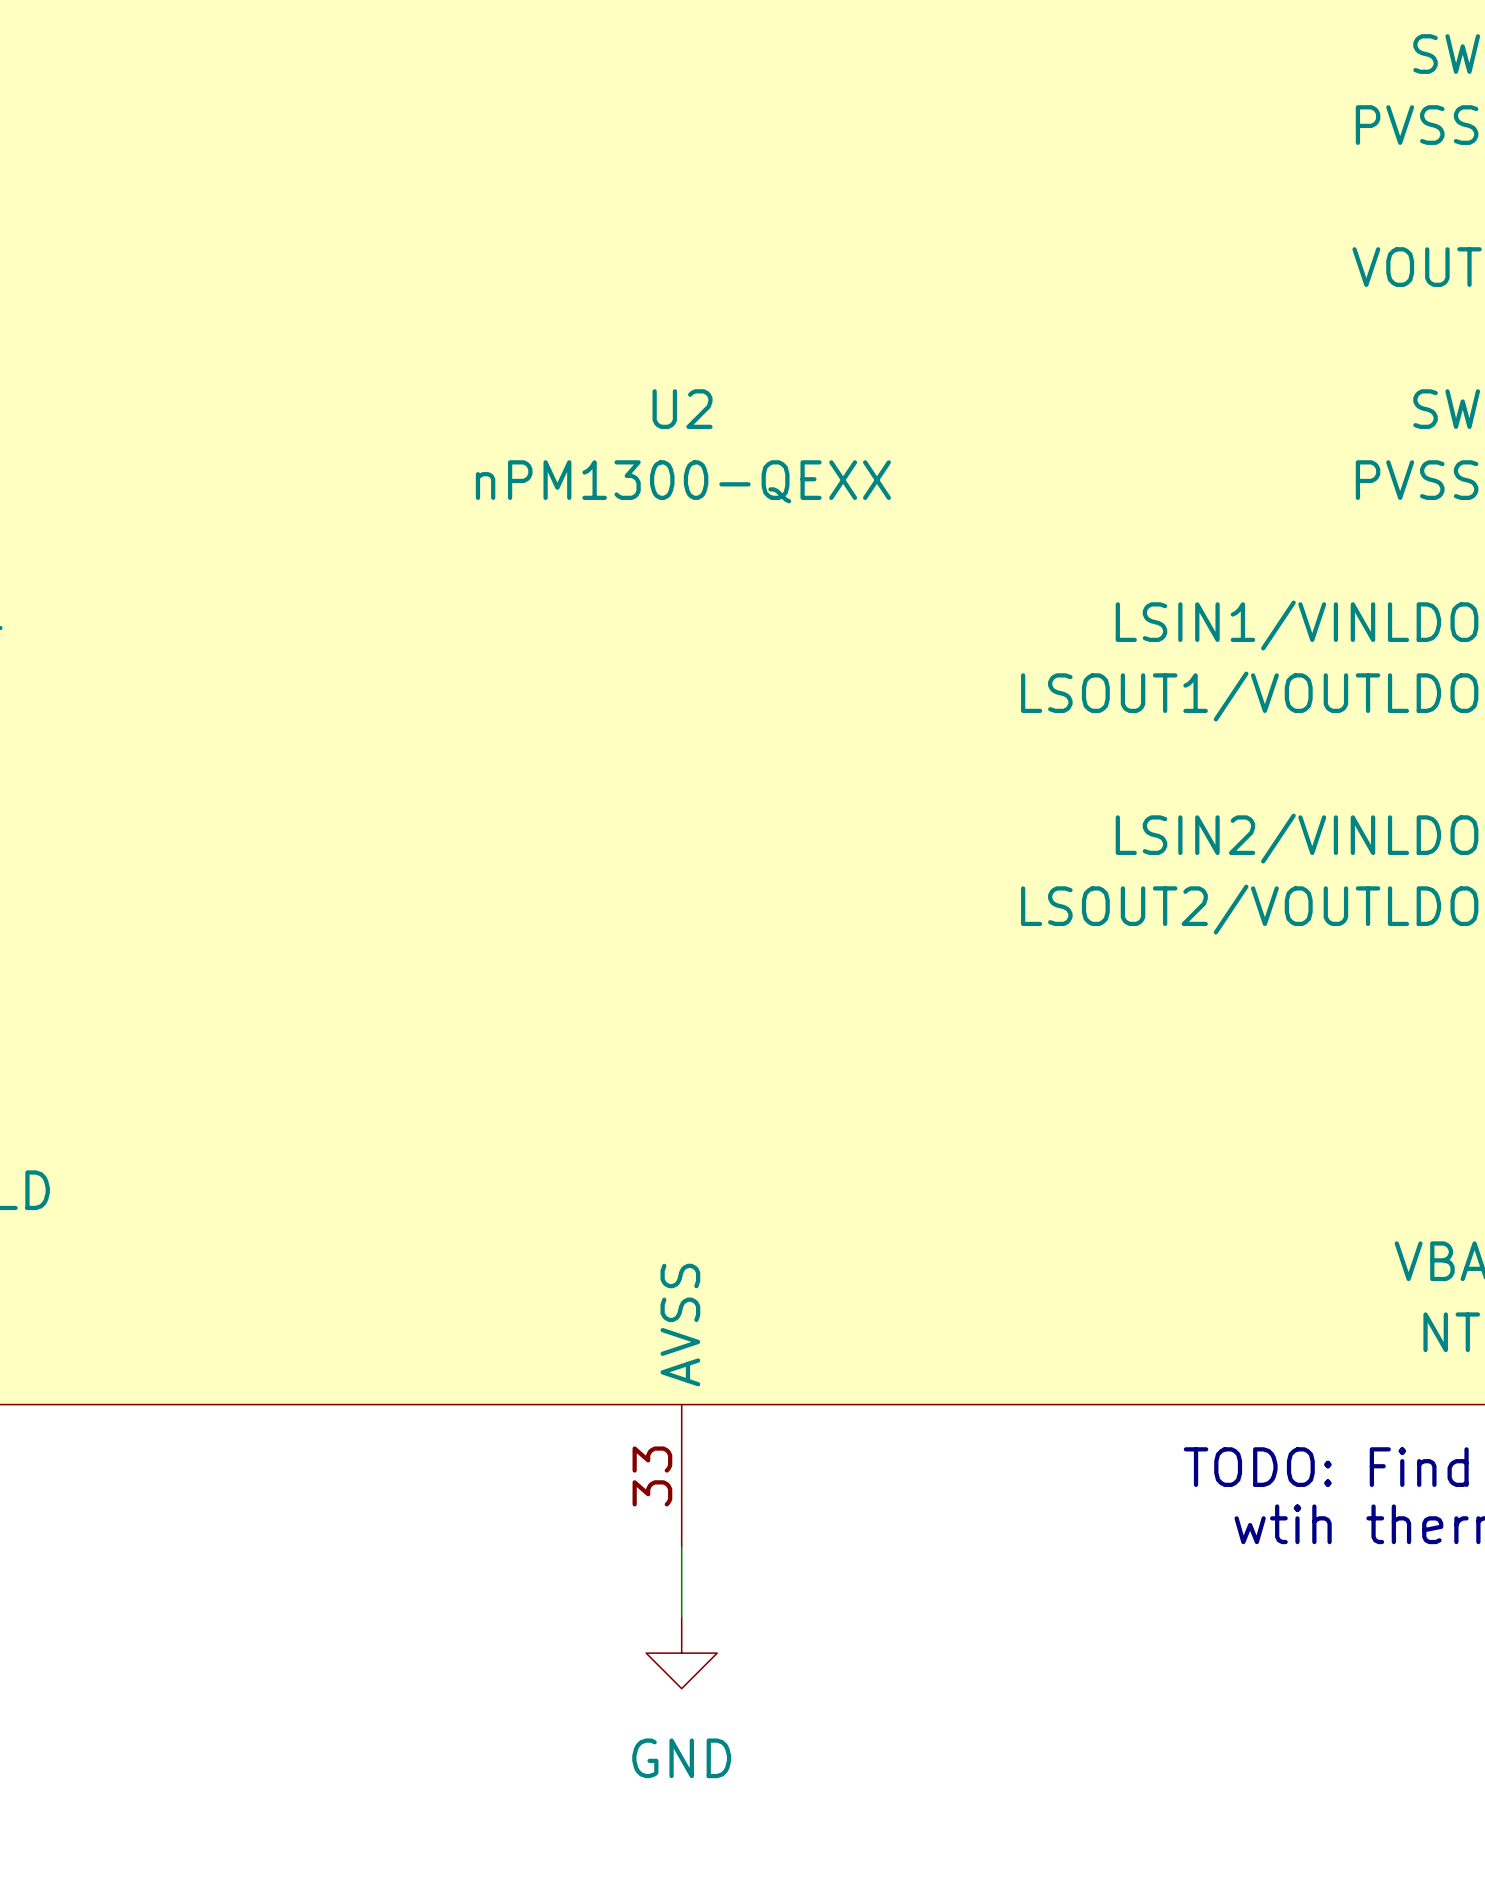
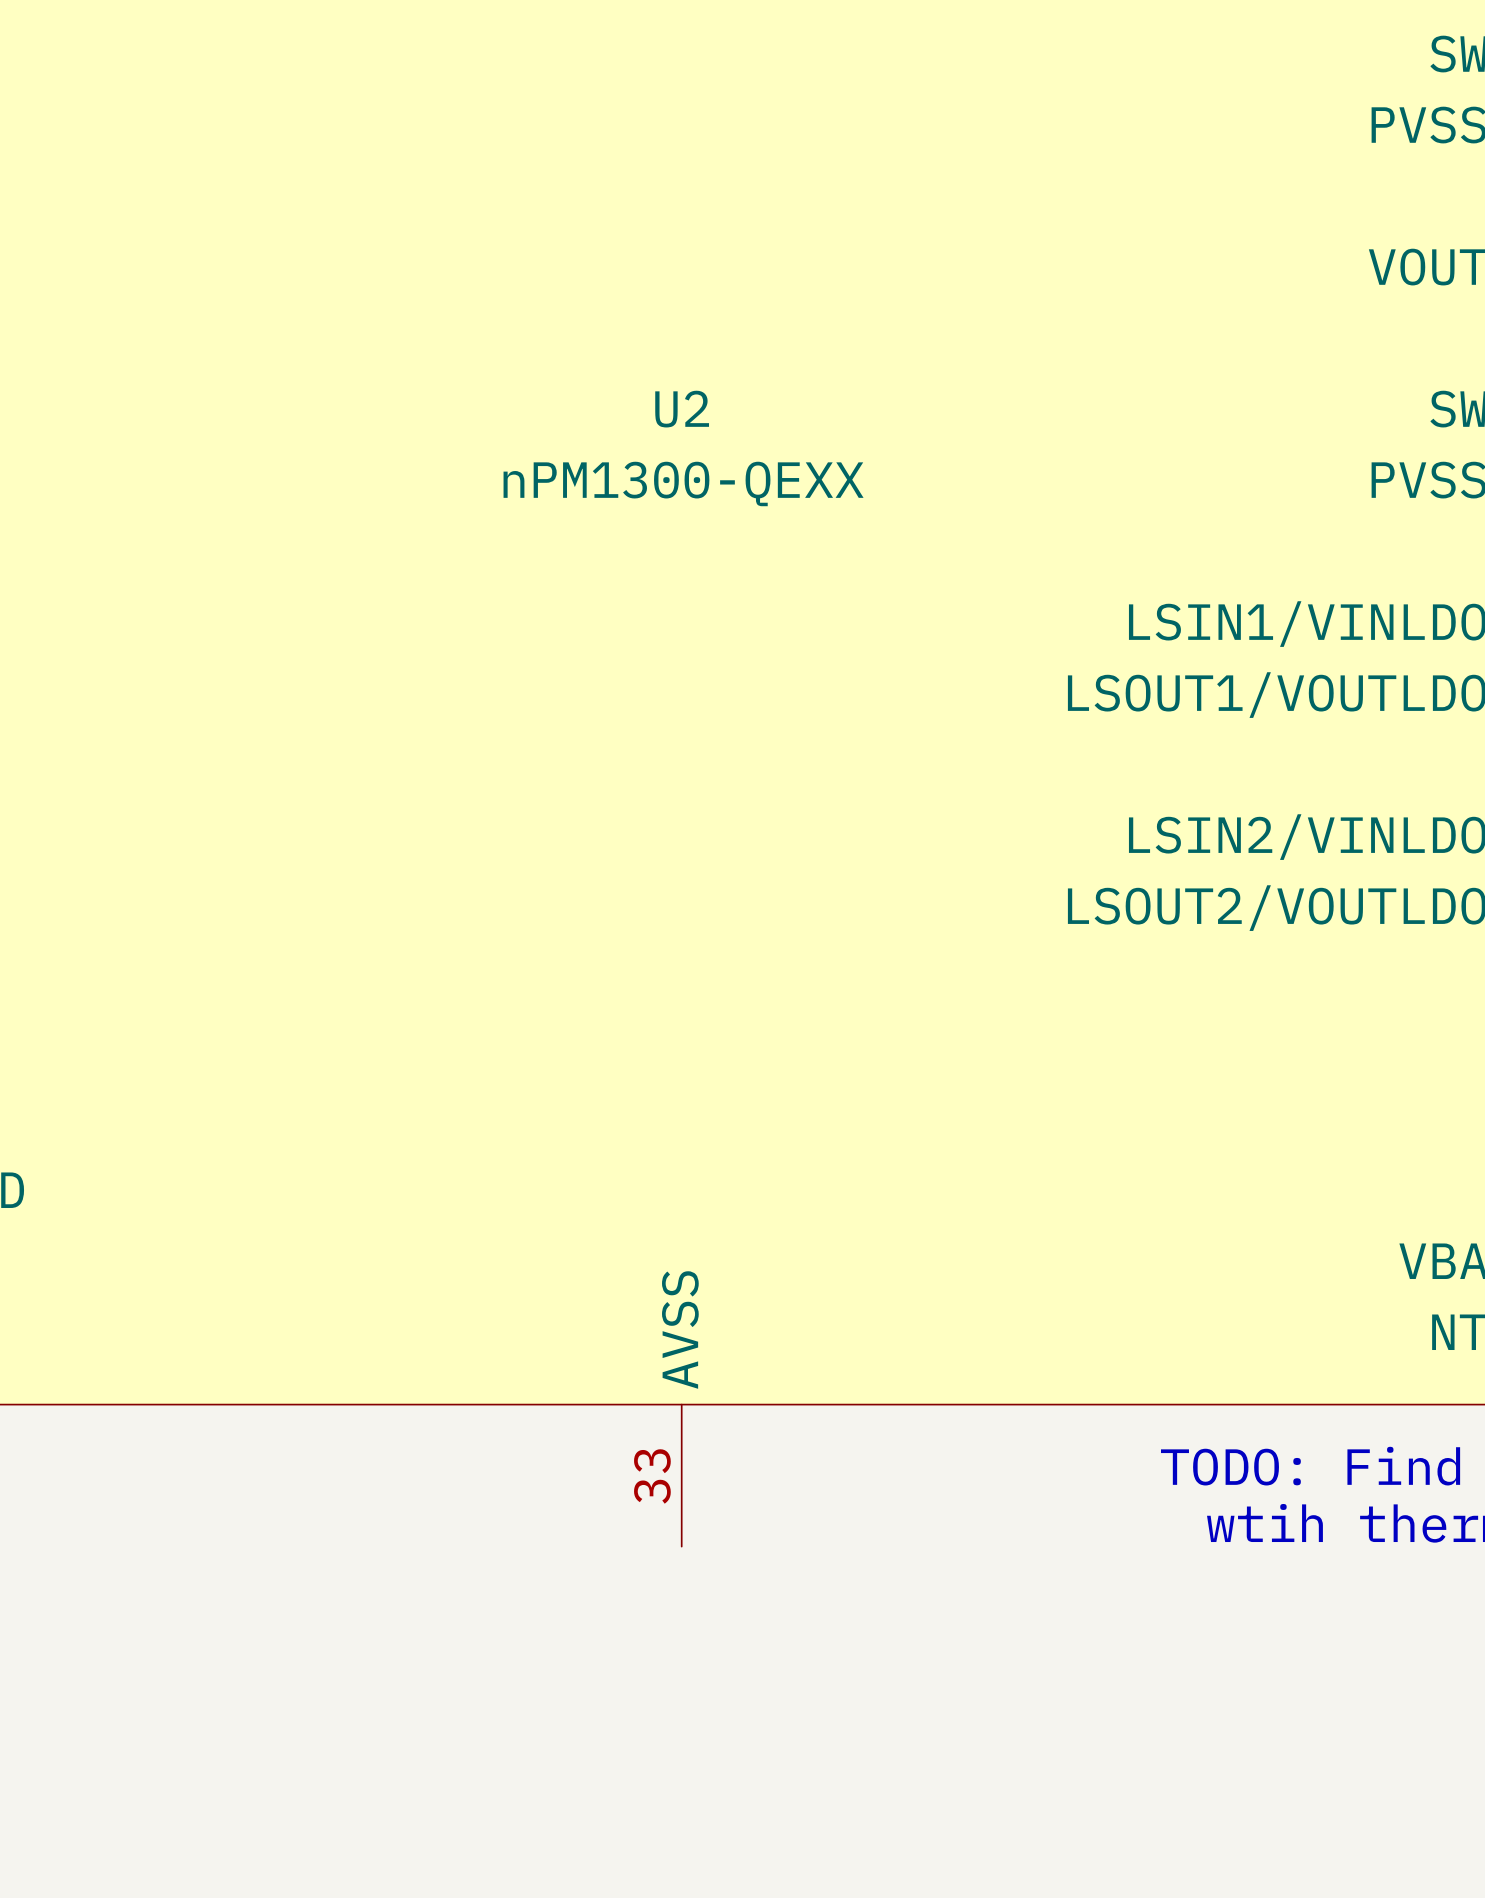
wire: (681, 1546) (681, 1617) -> none
power symbol: GND (681, 1653) -> none

